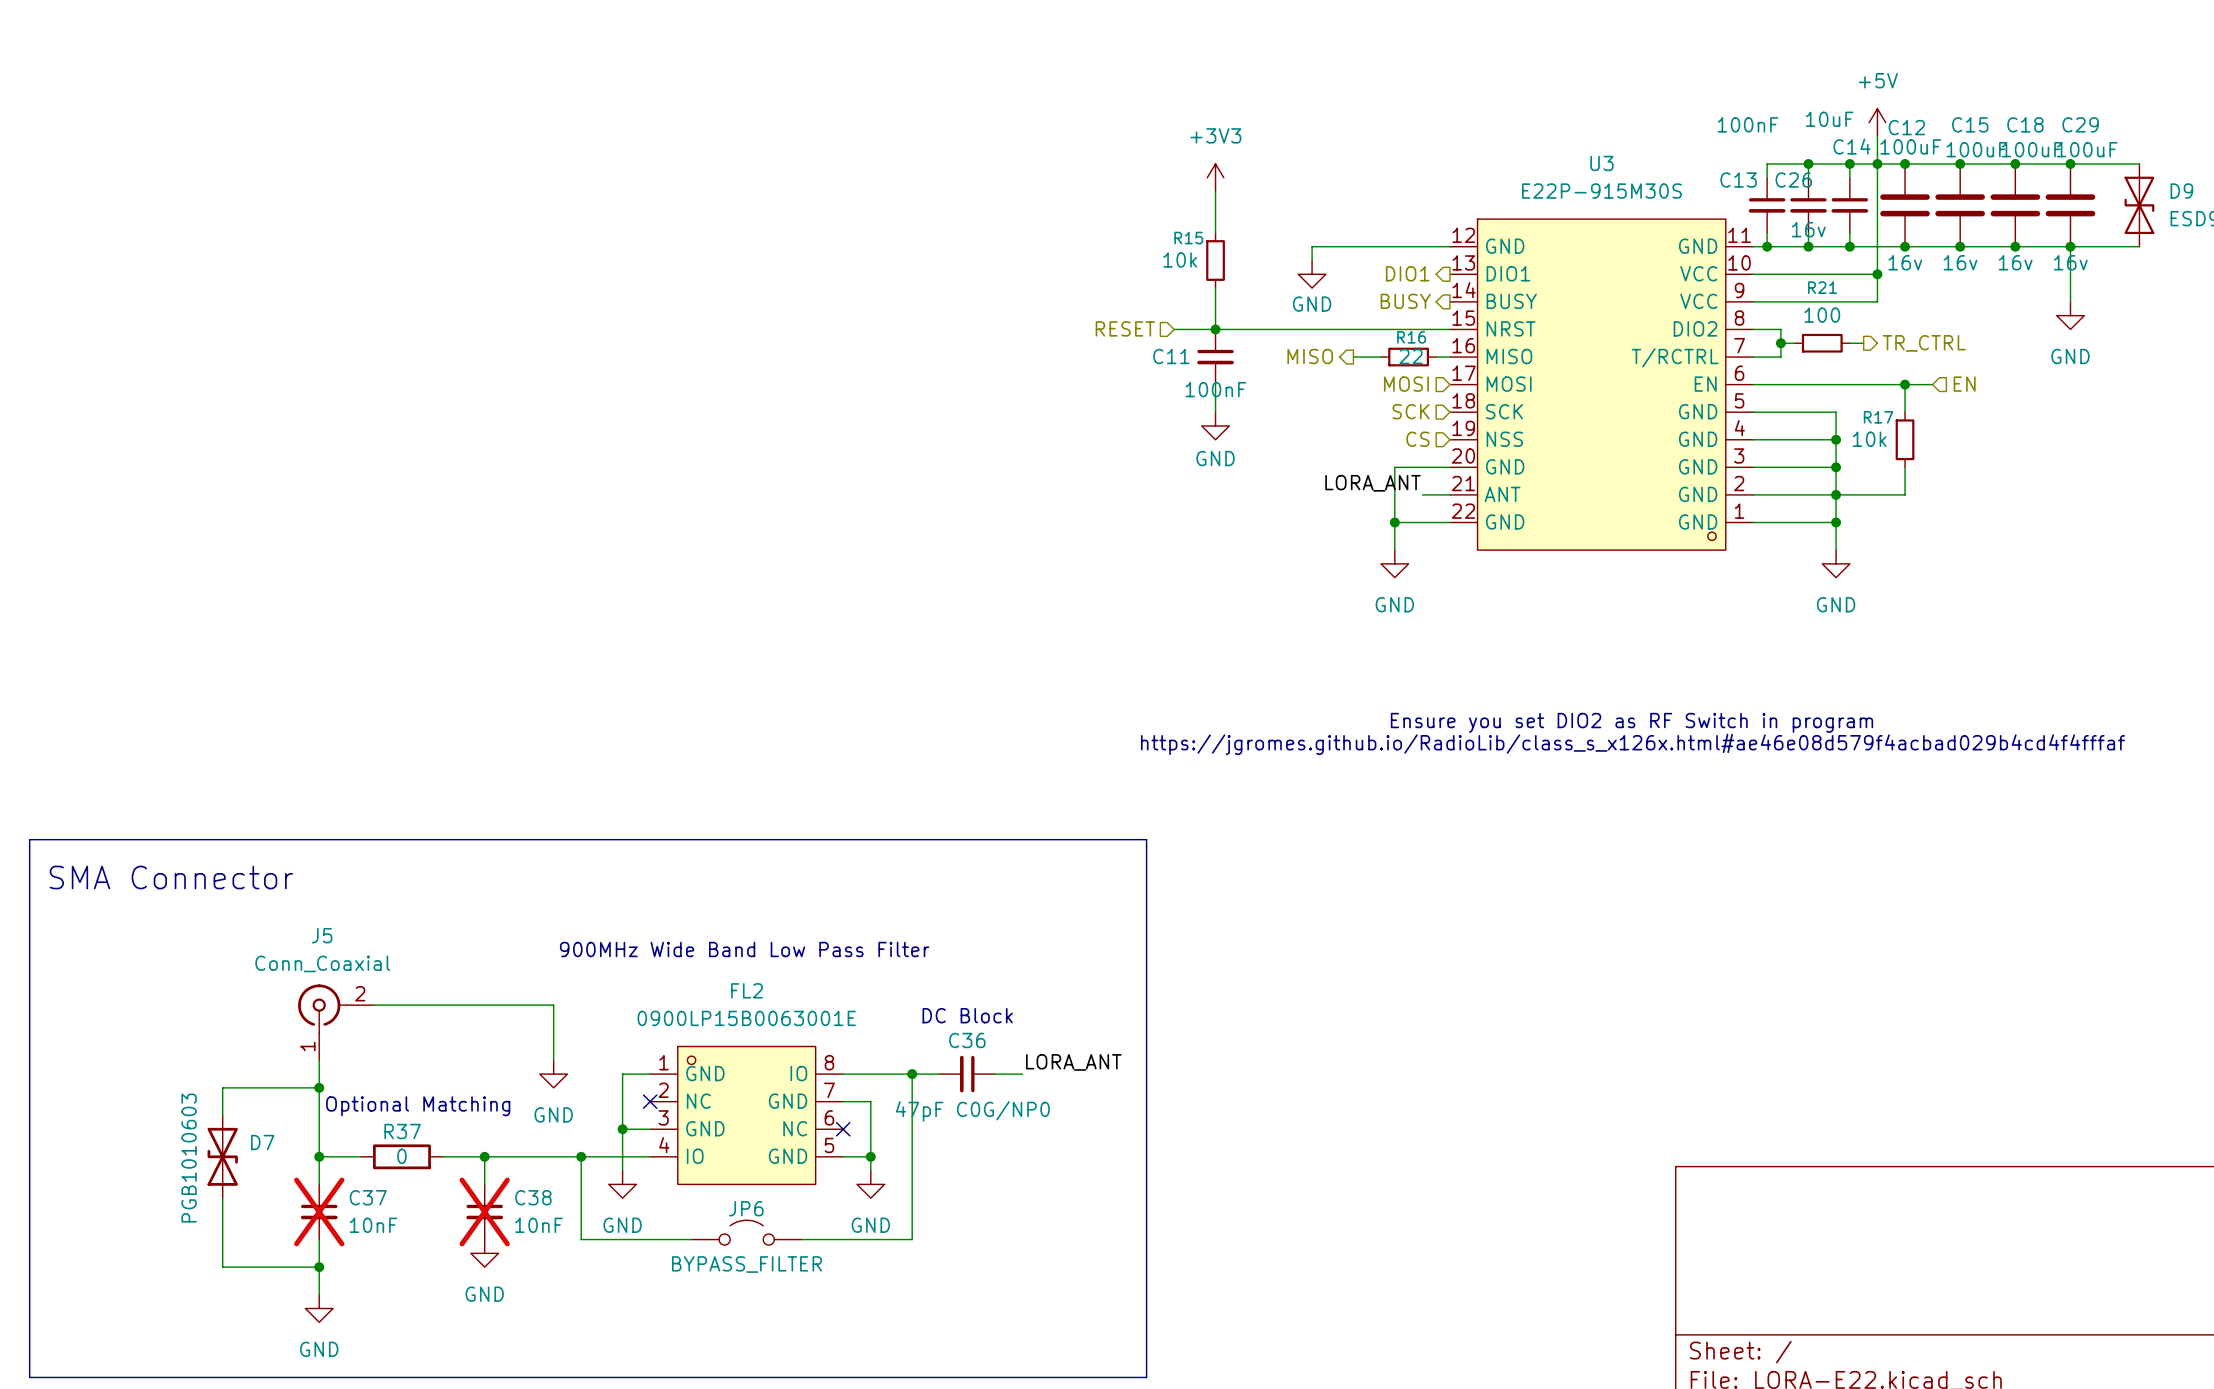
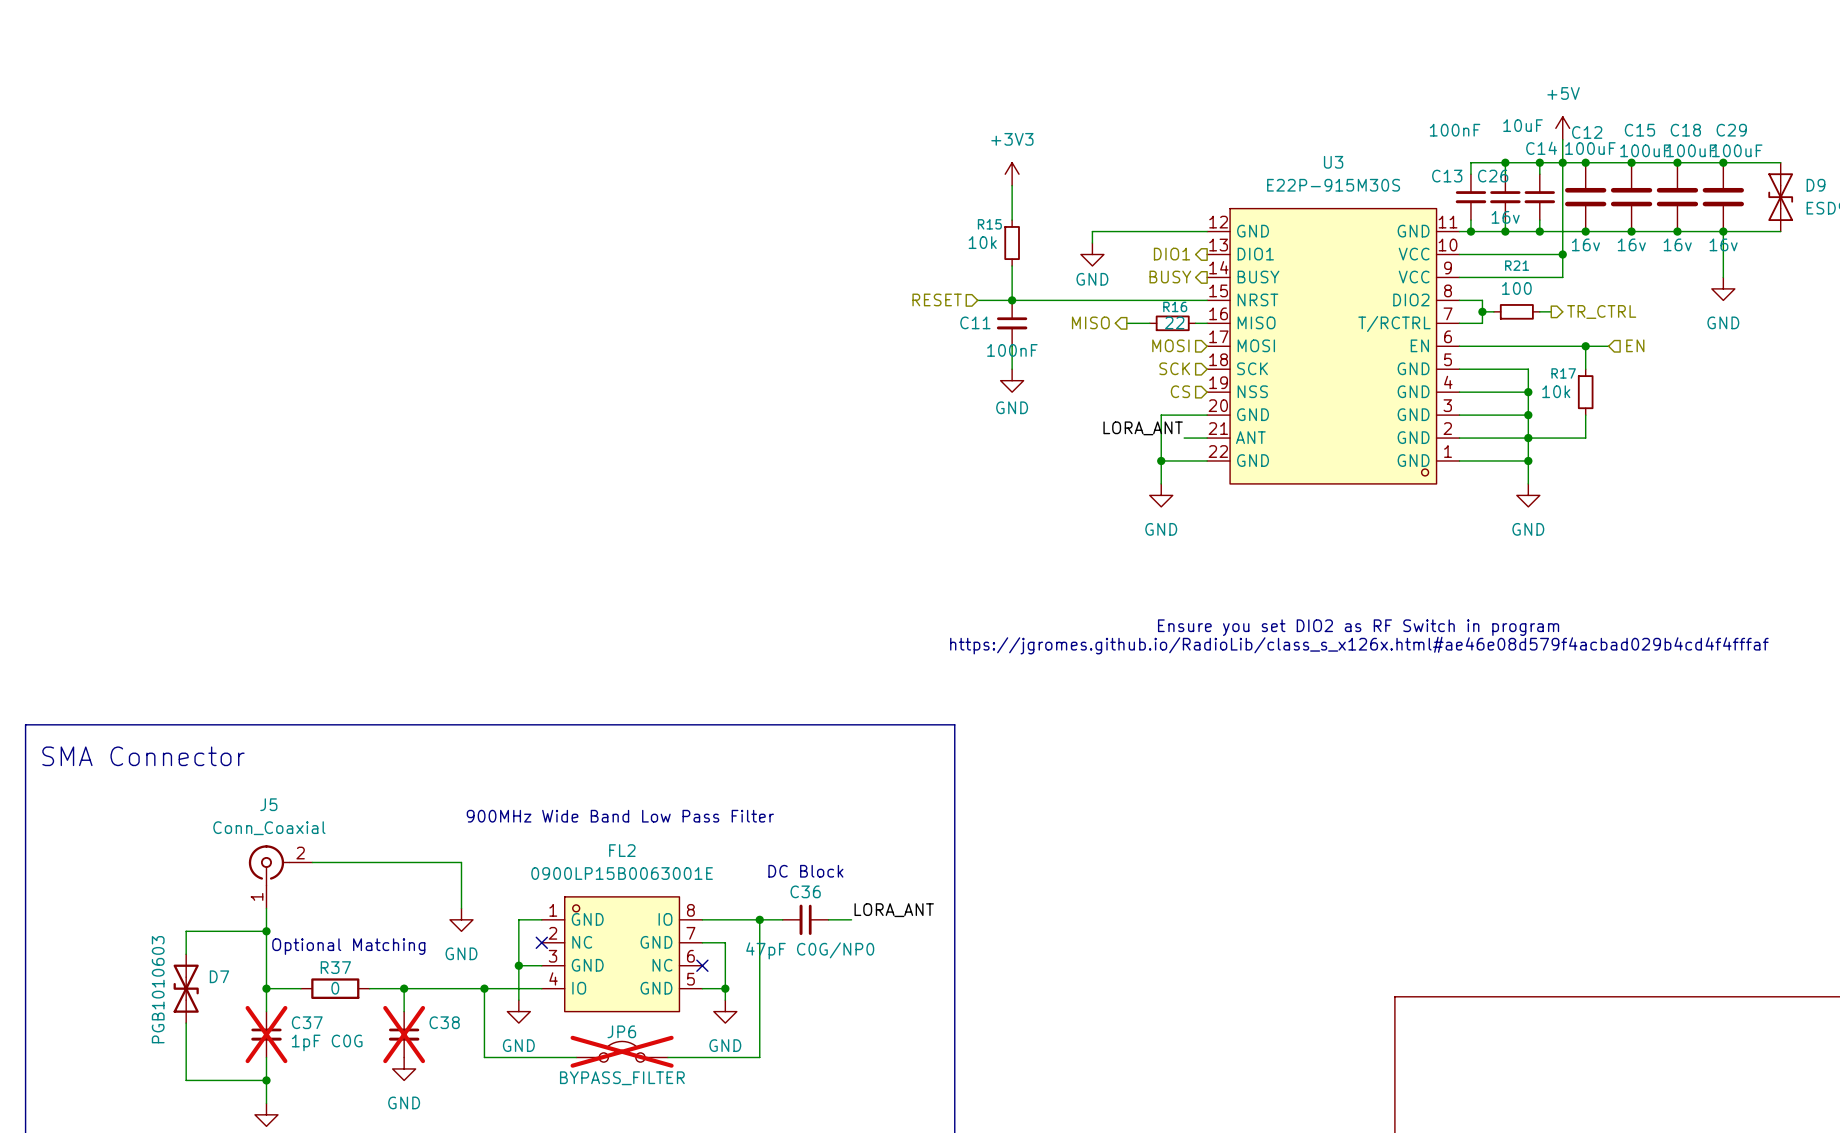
C37 value: 10nF (373, 1225) -> 1pF C0G (327, 1042)
C38 value: 10nF (538, 1225) -> none
JP6 do-not-place cross: none -> (622, 1051)

